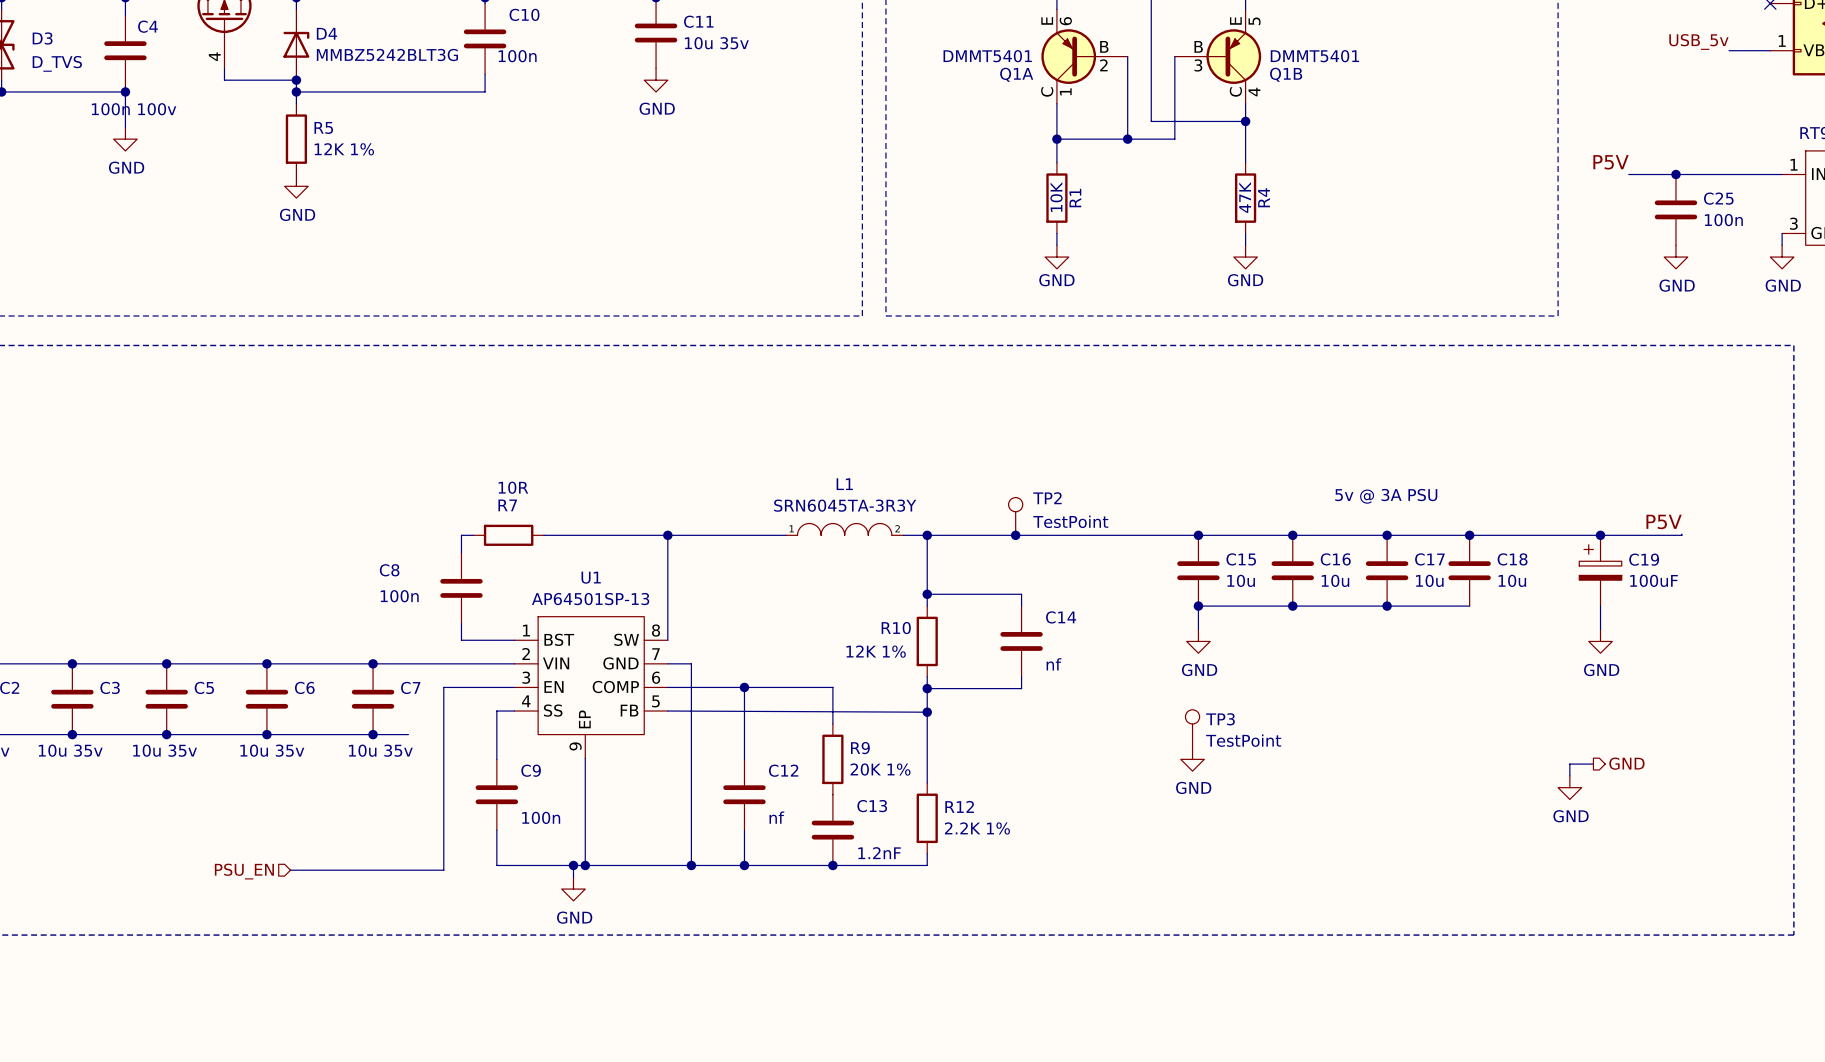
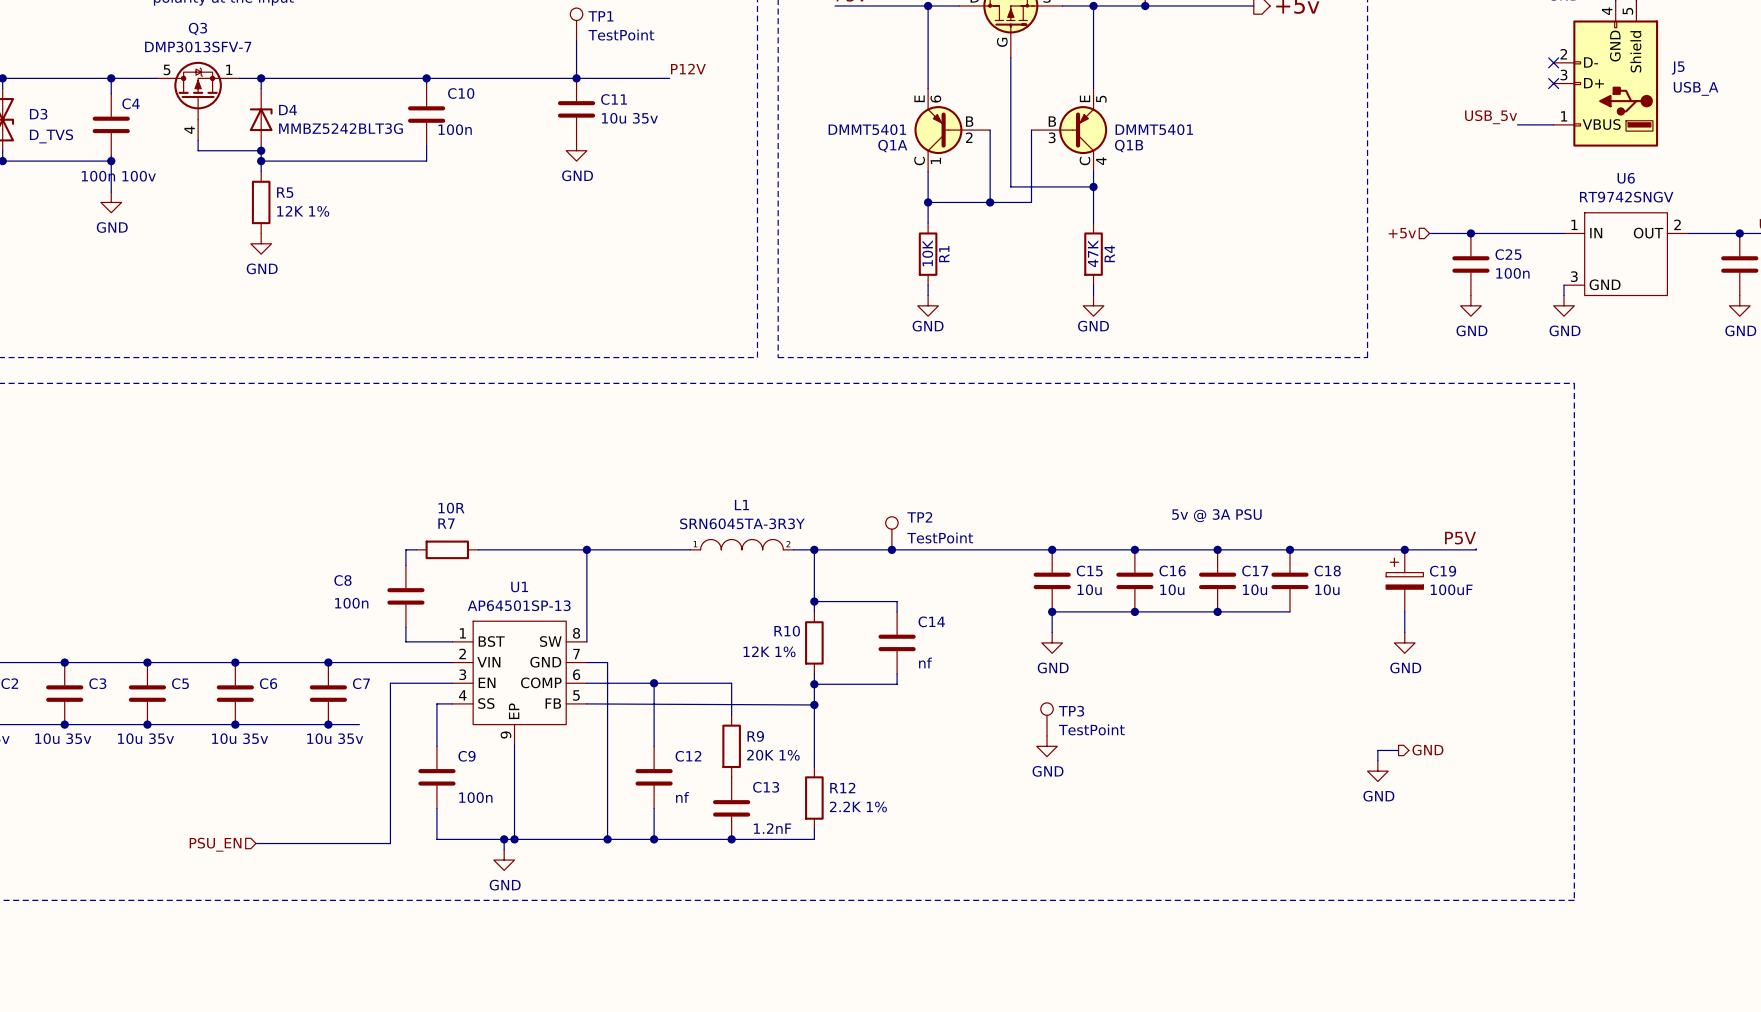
label: P5V (1611, 162) -> none
hierarchical label: none -> +5v (1402, 233)

